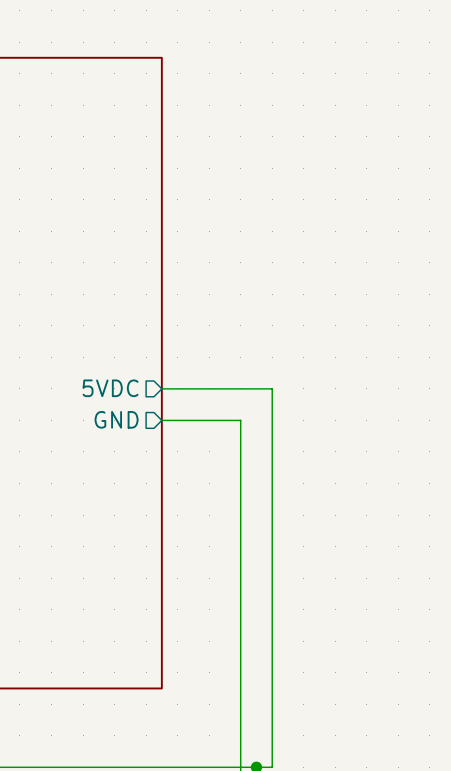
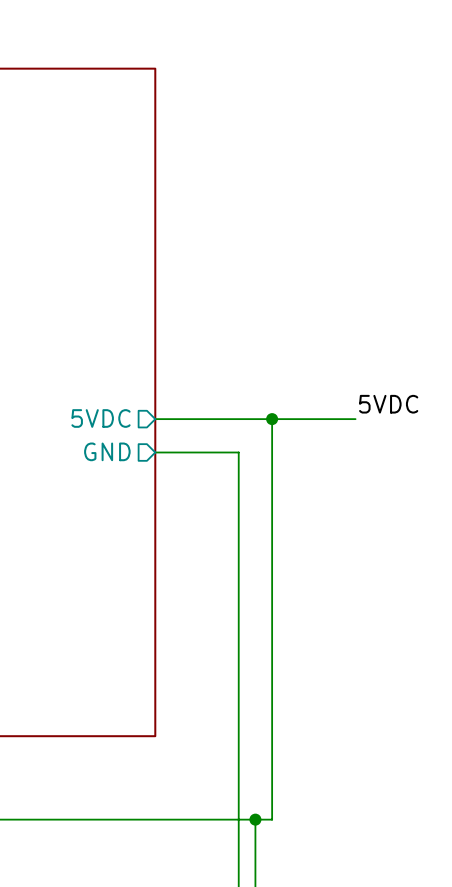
label: none -> 5VDC (388, 404)
wire: none -> (272, 419) (355, 419)
junction: none -> (272, 419)

